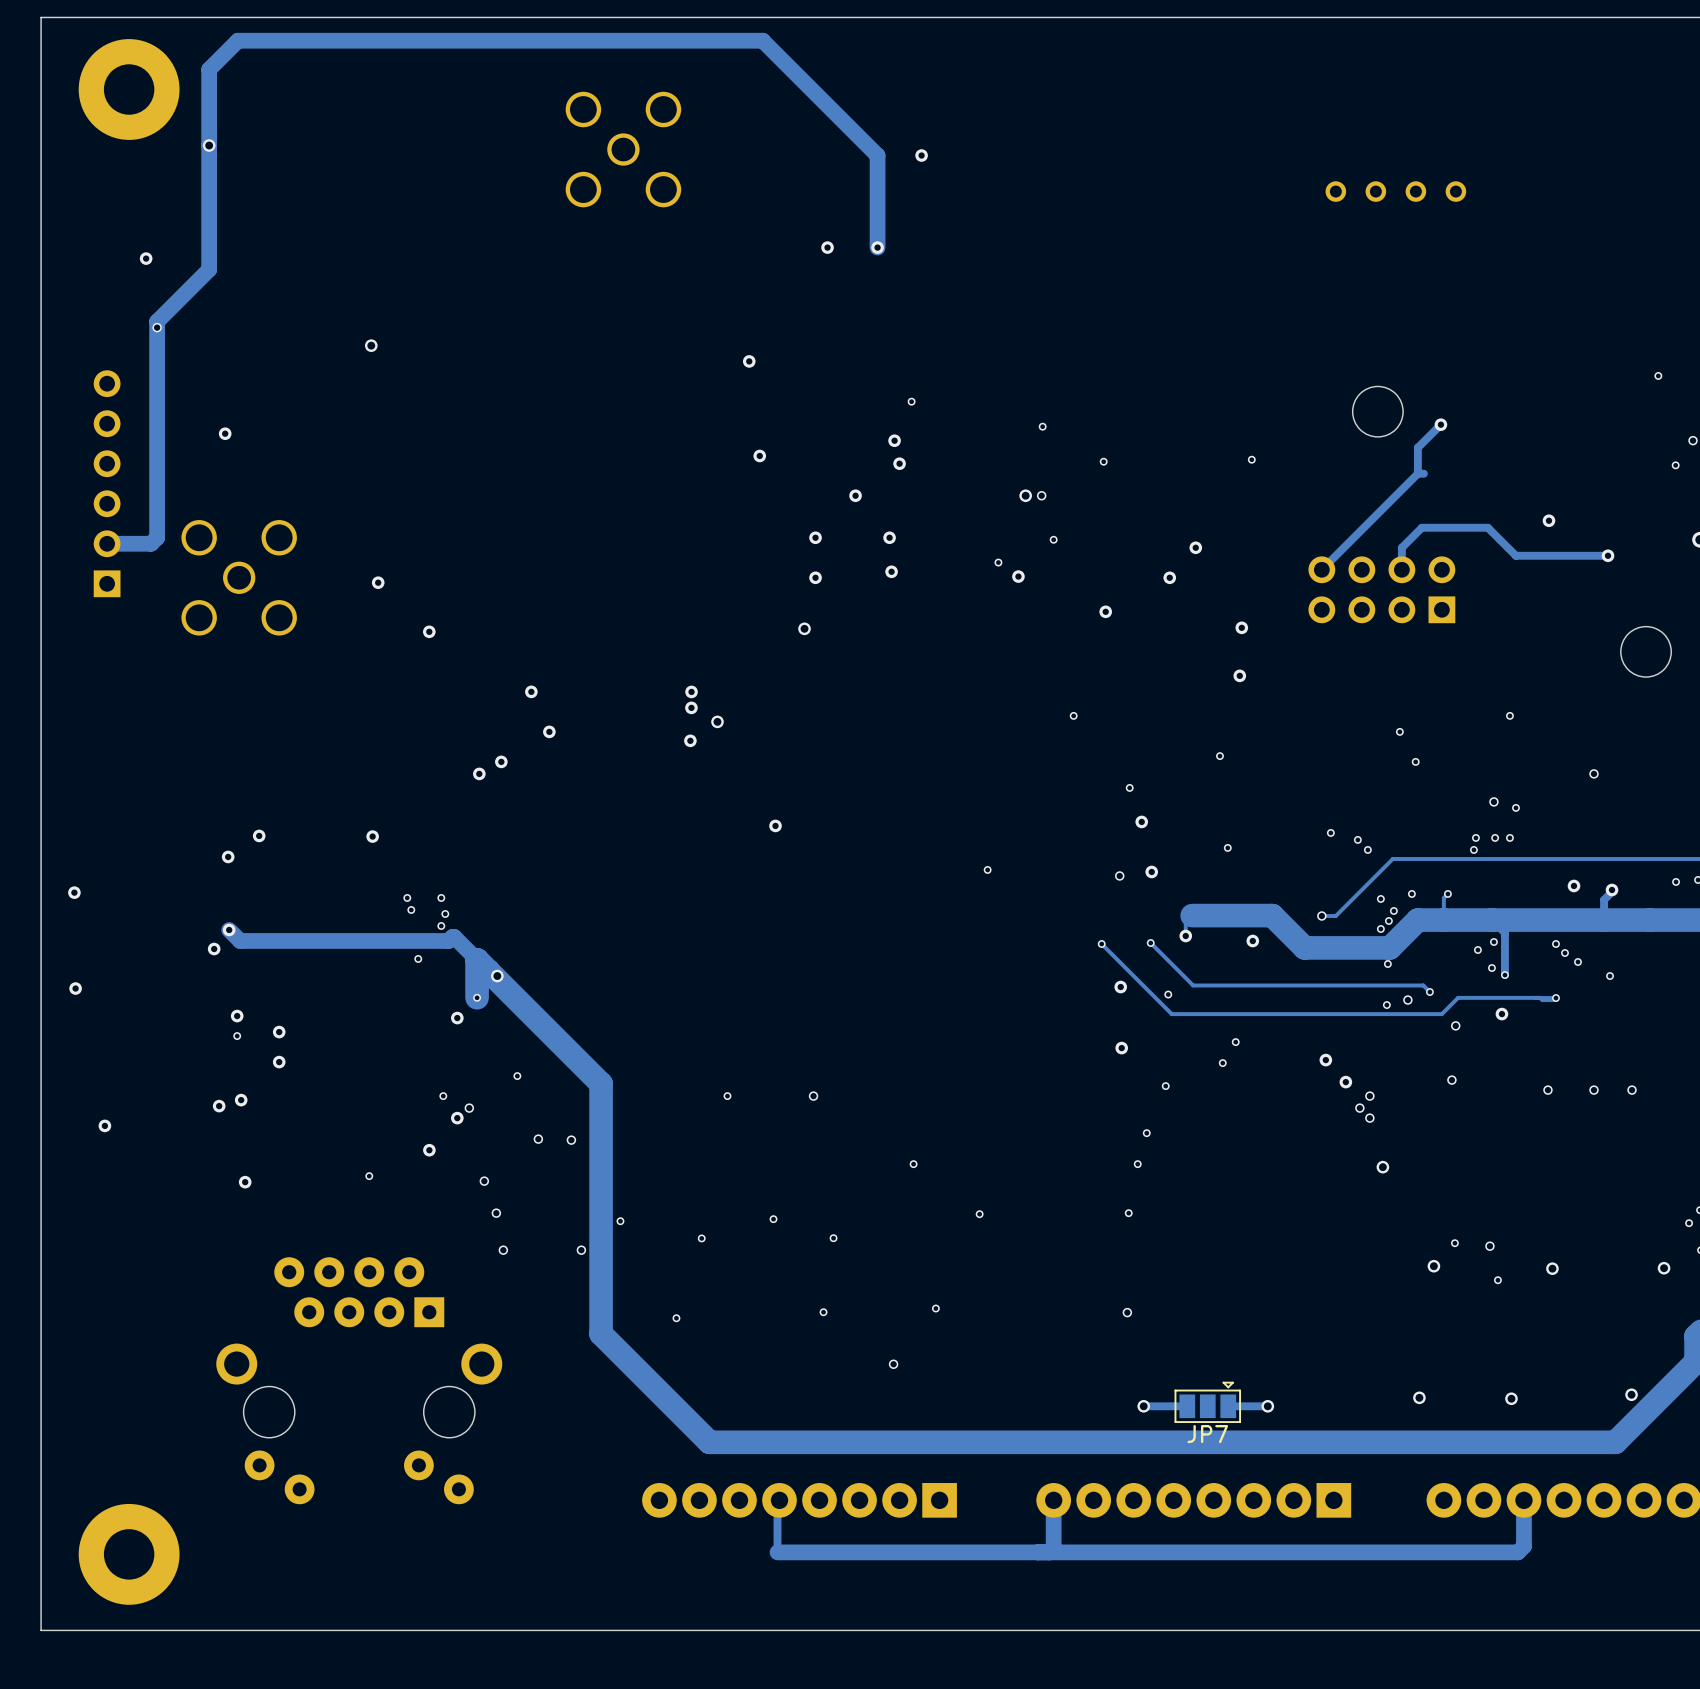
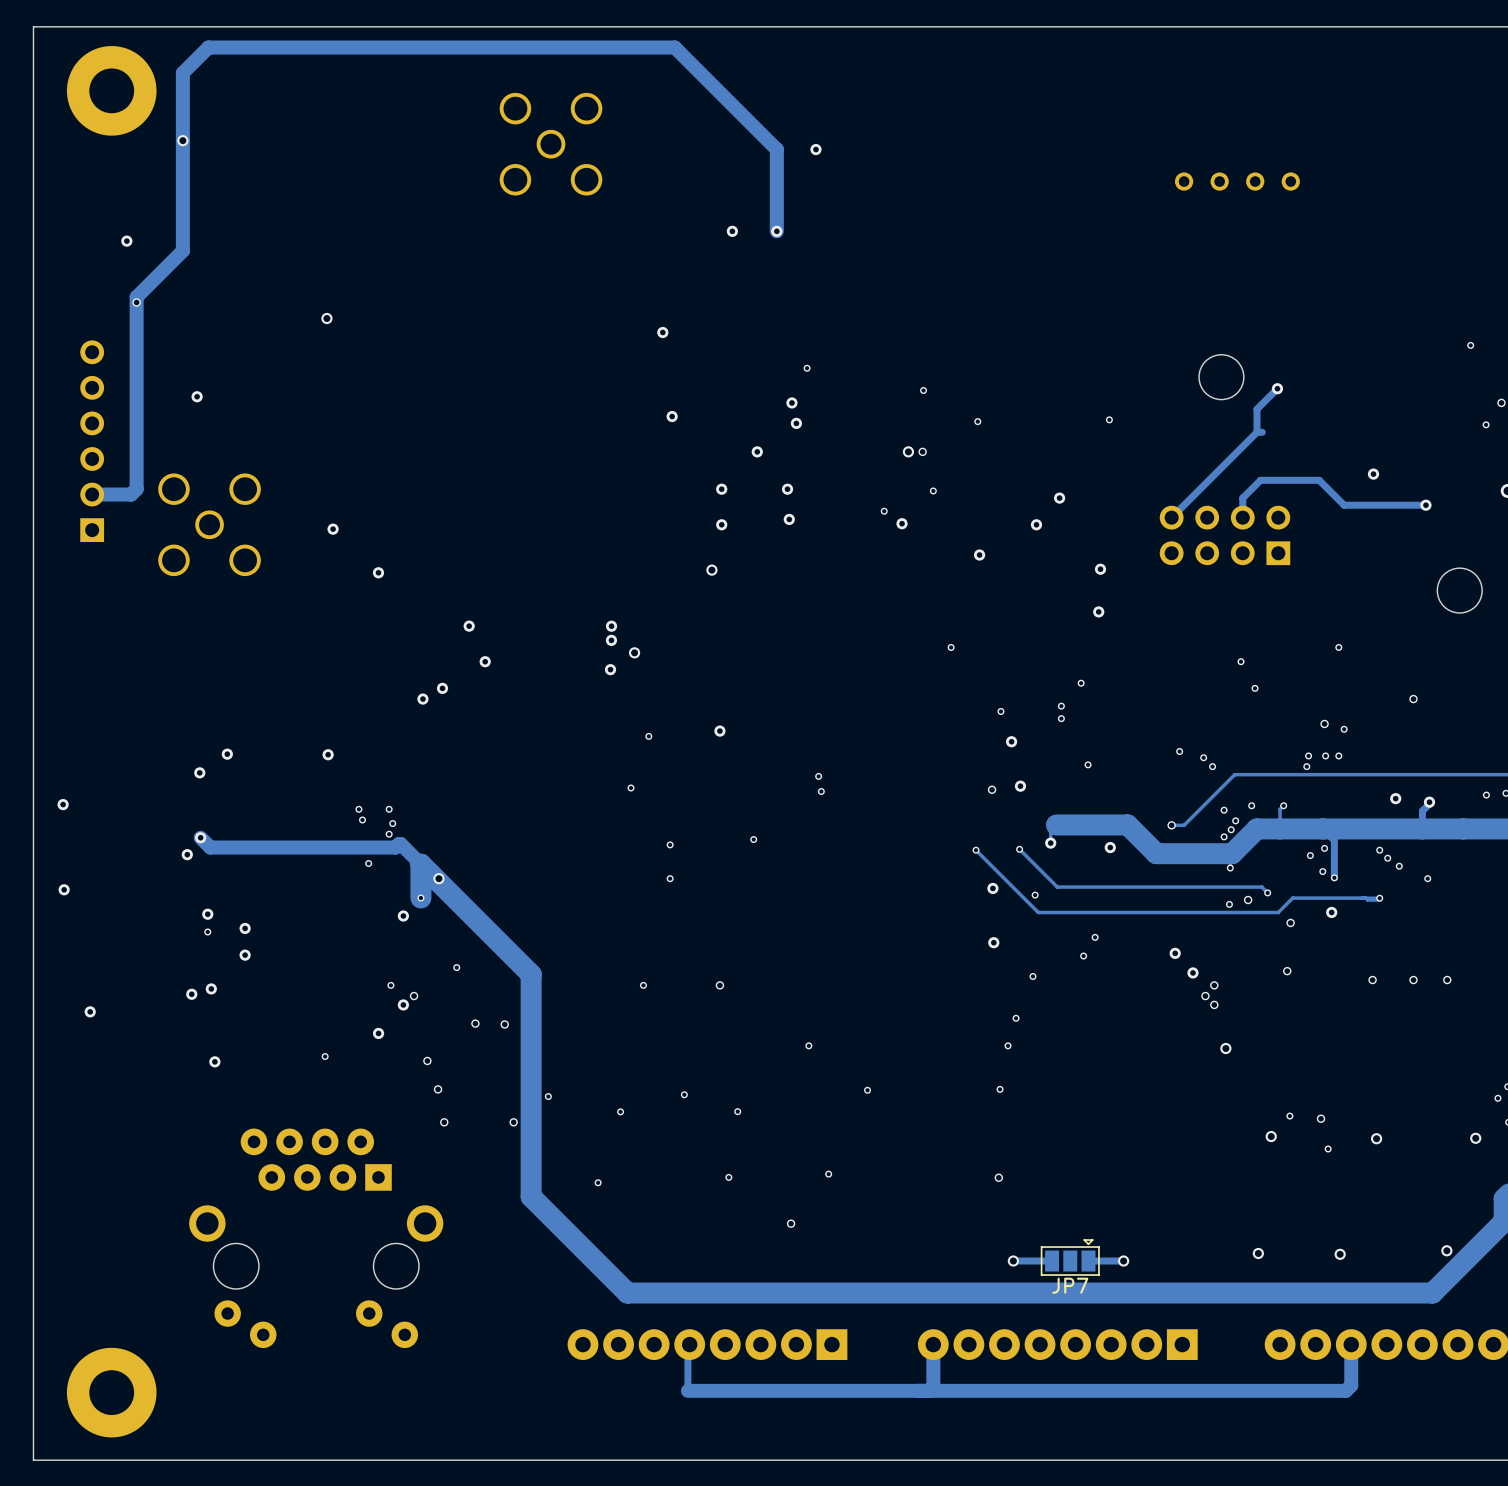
via: none -> (1061, 706)
via: none -> (1061, 718)
via: none -> (648, 736)
via position: (775, 825) -> (719, 731)
via: none -> (818, 776)
via: (987, 869) -> none
via: none -> (631, 787)
via: none -> (821, 791)
via: none -> (753, 839)
via: none -> (670, 844)
via: none -> (670, 878)

